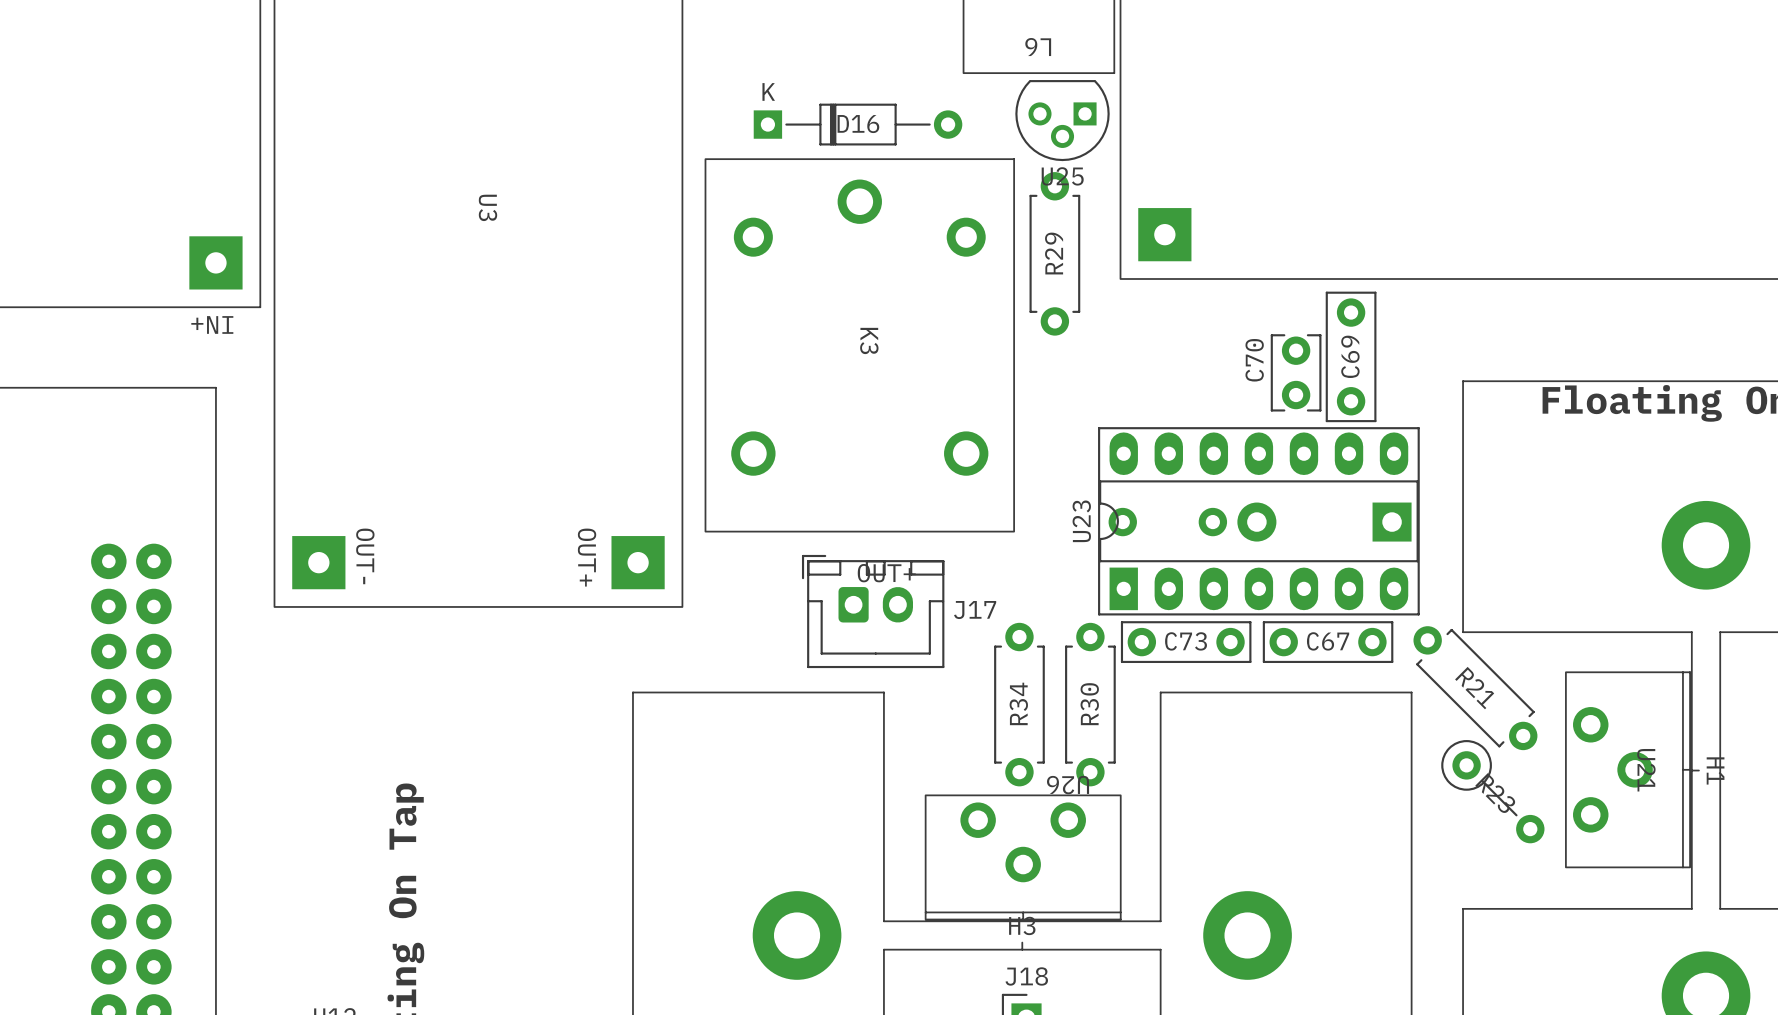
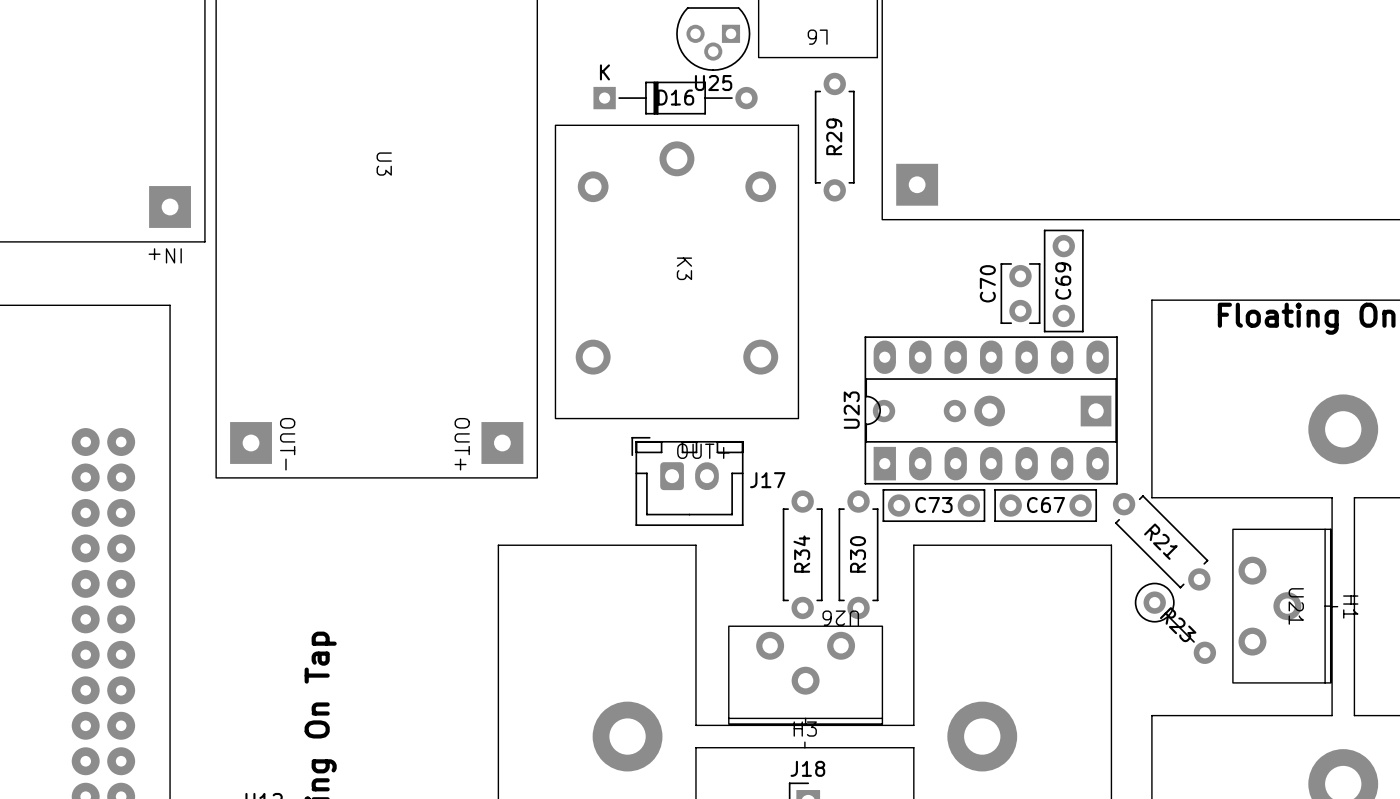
U25 position: (1062, 120) -> (713, 39)
R29 position: (1054, 253) -> (834, 137)

